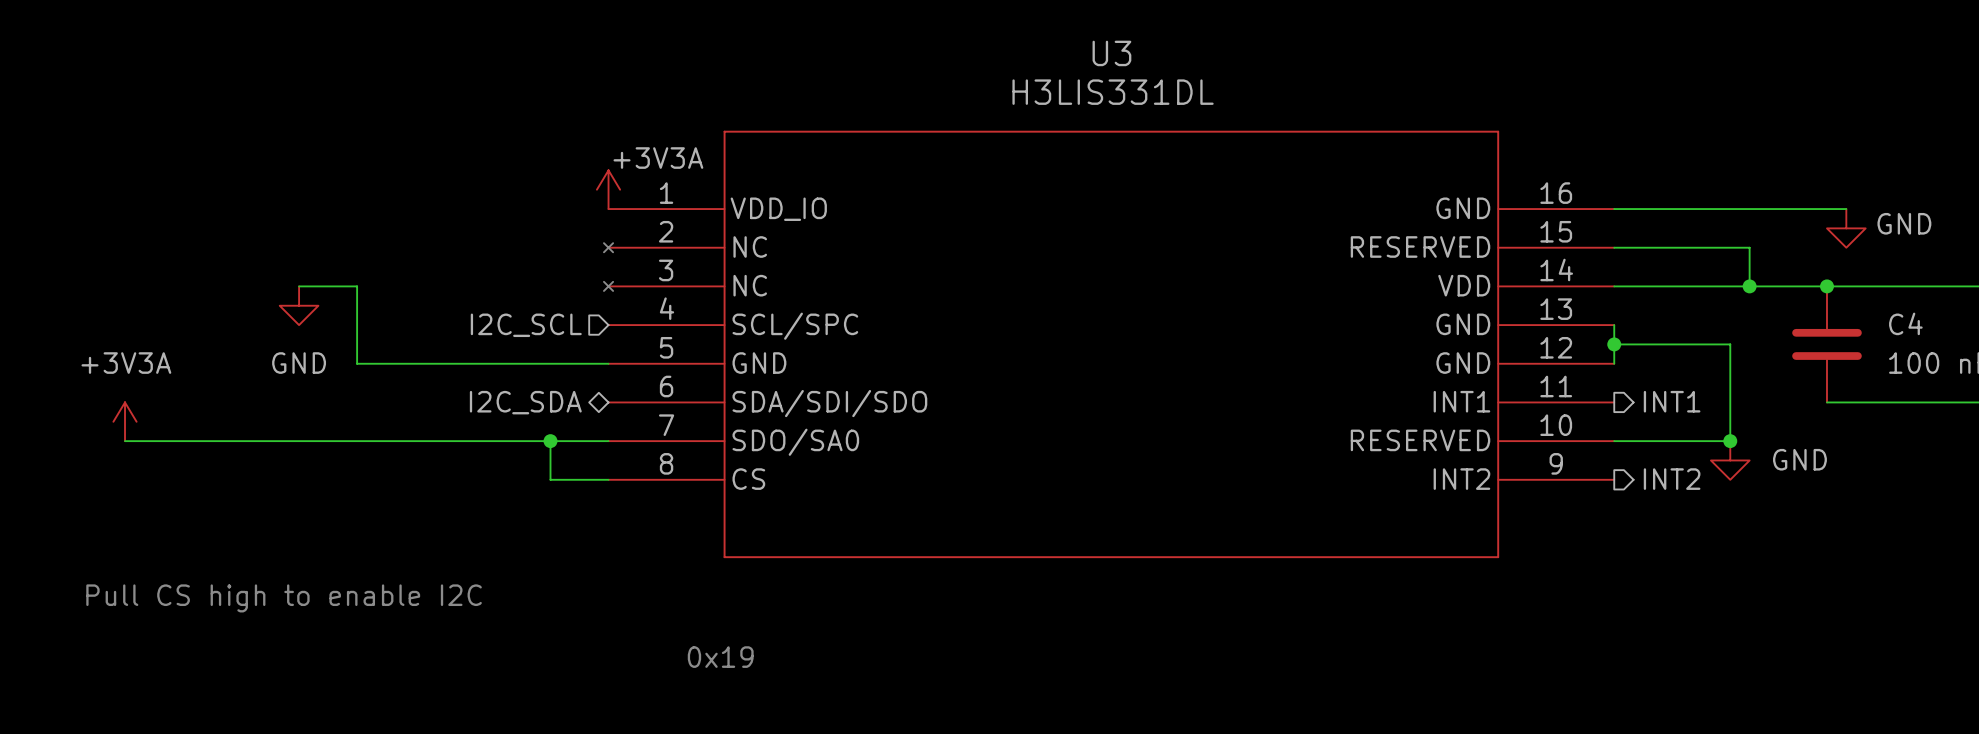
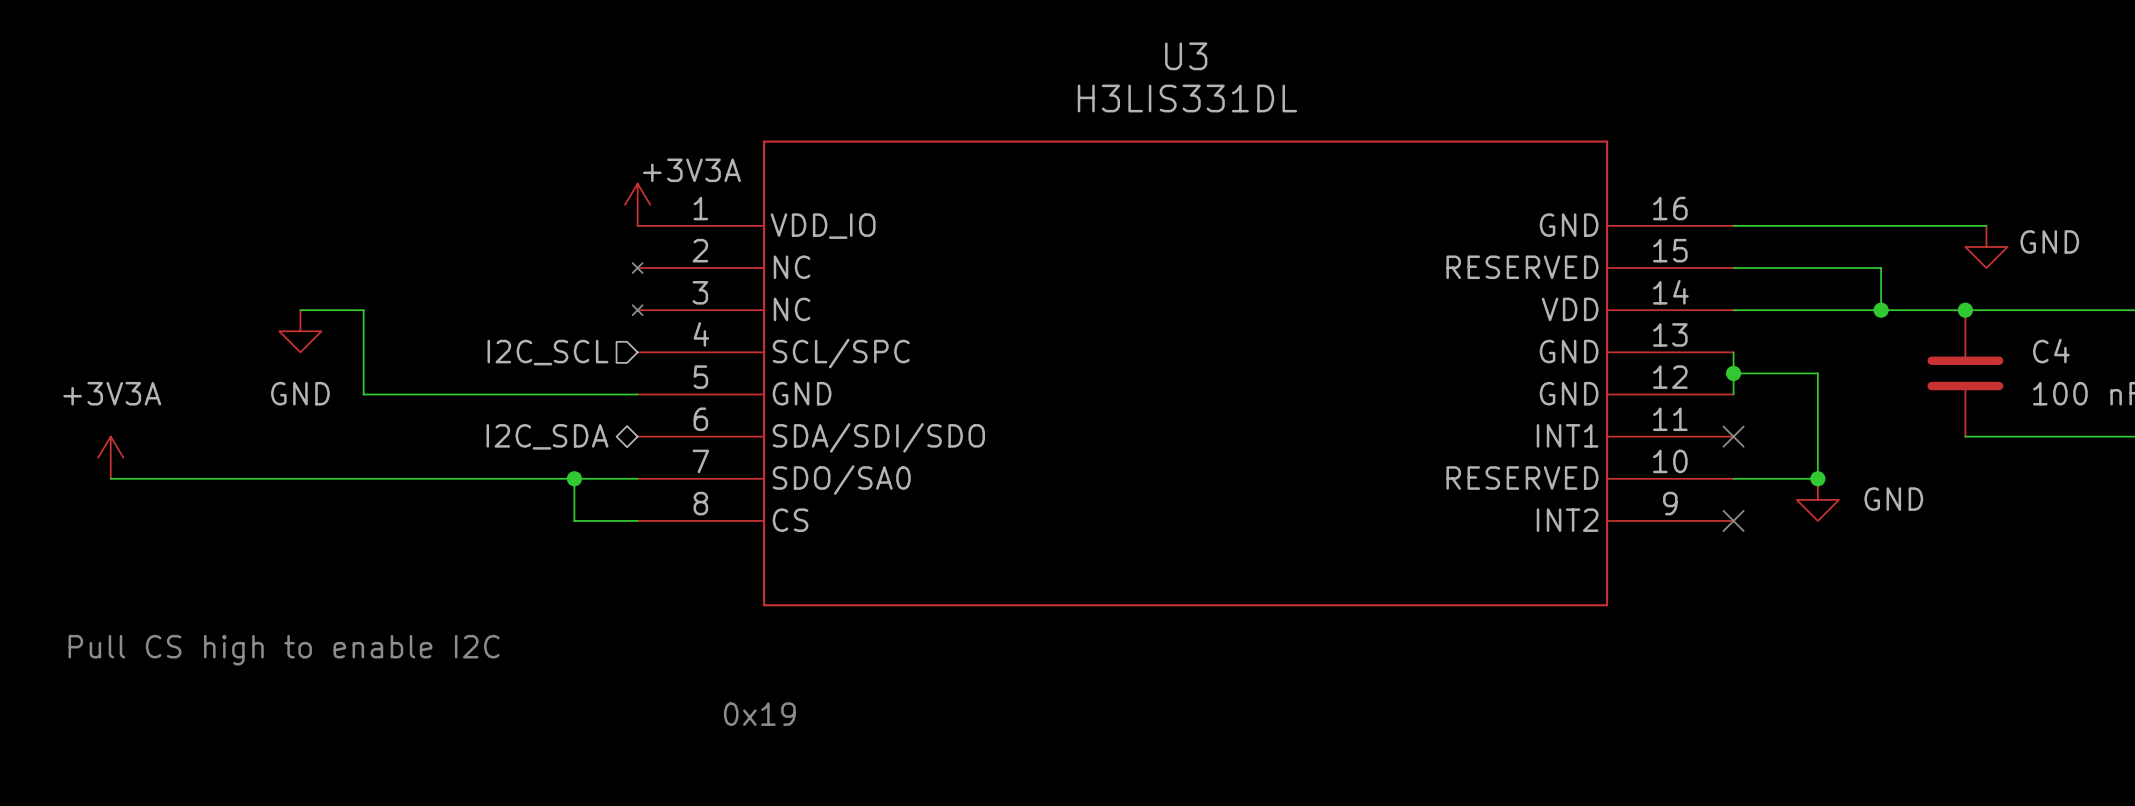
wire: (1691, 344) (1730, 344) (1730, 441) (1691, 441) -> (1817, 373) (1817, 478)
hierarchical label: INT1 (1672, 401) -> none
no-connect mark: none -> (1733, 436)
junction position: (1730, 441) -> (1817, 478)
power symbol position: GND (1730, 460) -> GND (1817, 499)
no-connect mark: none -> (1733, 520)
hierarchical label: INT2 (1672, 479) -> none

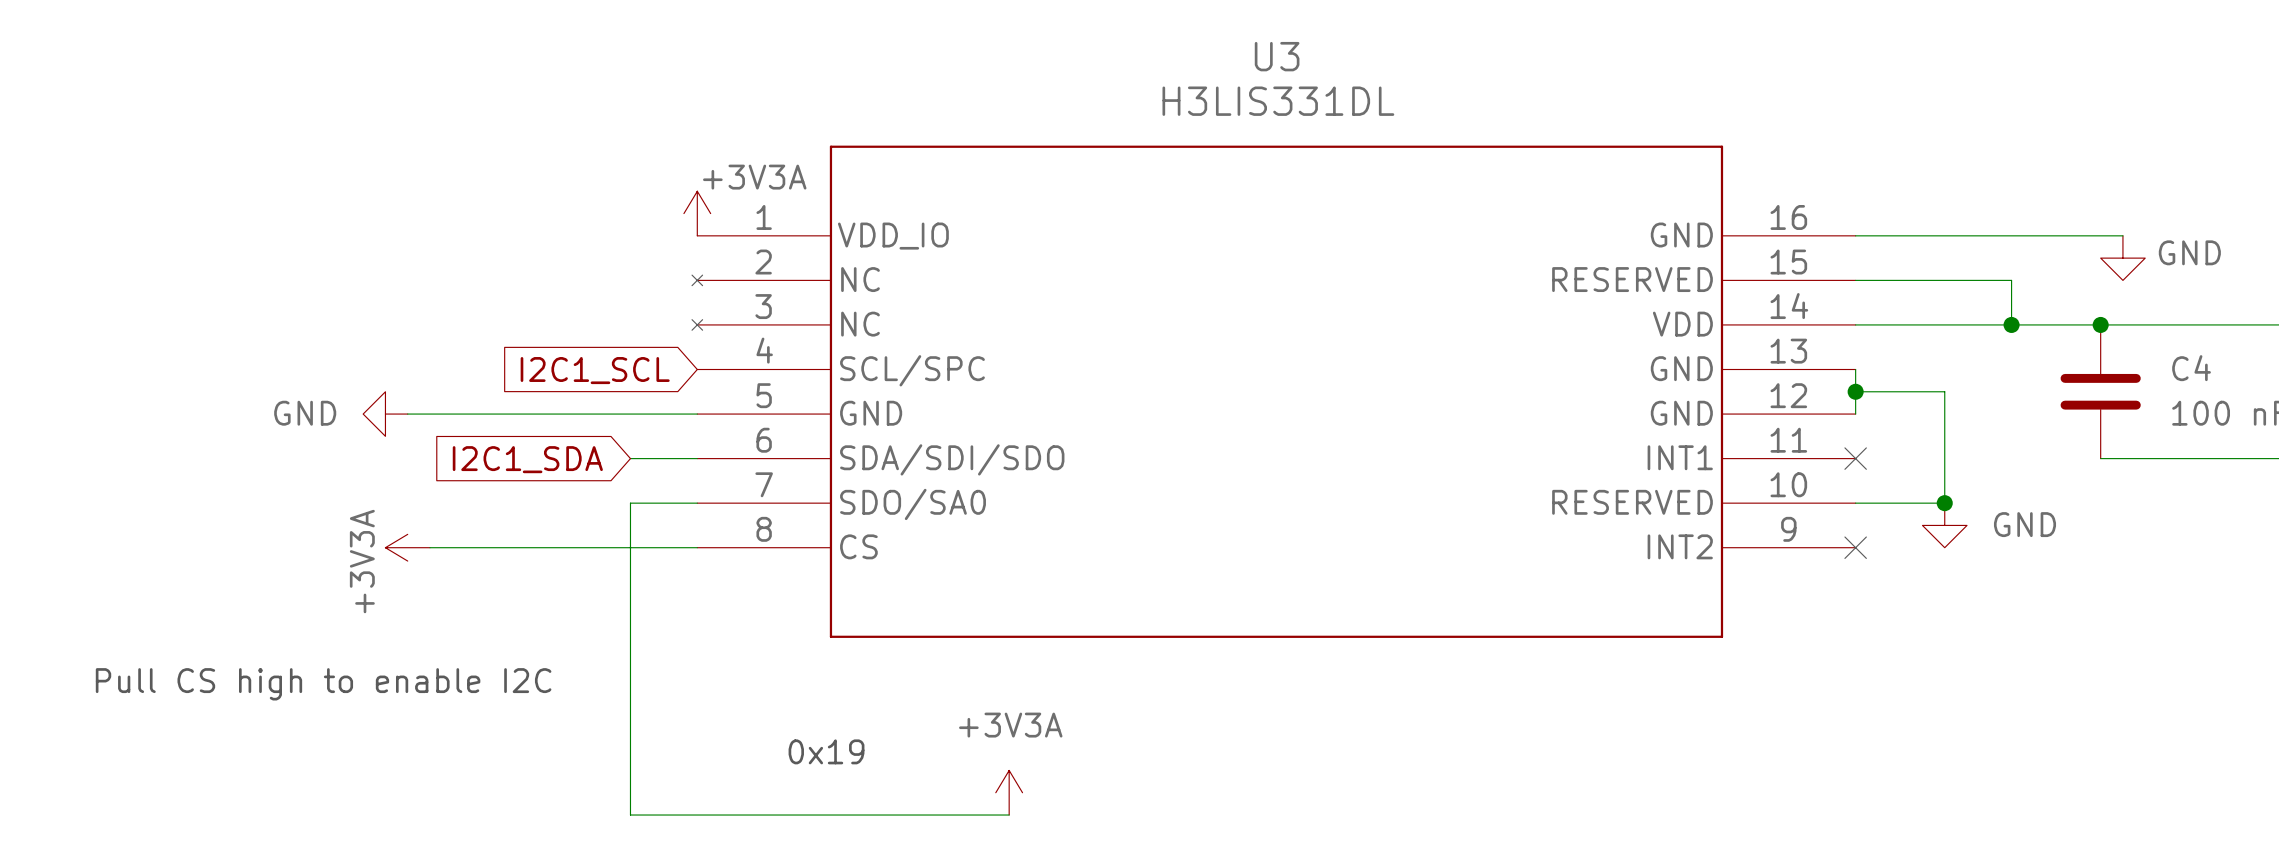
wire: (300, 310) (363, 310) (363, 394) -> none
power symbol rotation: 0° (300, 331) -> 90° clockwise (385, 414)
power symbol position: GND (300, 331) -> GND (385, 414)
hierarchical label: I2C_SCL (547, 352) -> none
global label: none -> I2C1_SCL (595, 370)
hierarchical label: I2C_SDA (547, 436) -> none
wire: none -> (630, 458) (697, 458)
global label: none -> I2C1_SDA (527, 459)
power symbol rotation: 0° (110, 457) -> 90° counterclockwise (407, 547)
power symbol position: +3V3A (110, 457) -> +3V3A (407, 547)
wire: (110, 478) (574, 478) -> none
junction: (574, 478) -> none
wire: none -> (430, 547) (630, 547) (630, 815) (1009, 815)
power symbol: none -> +3V3A (1009, 792)

